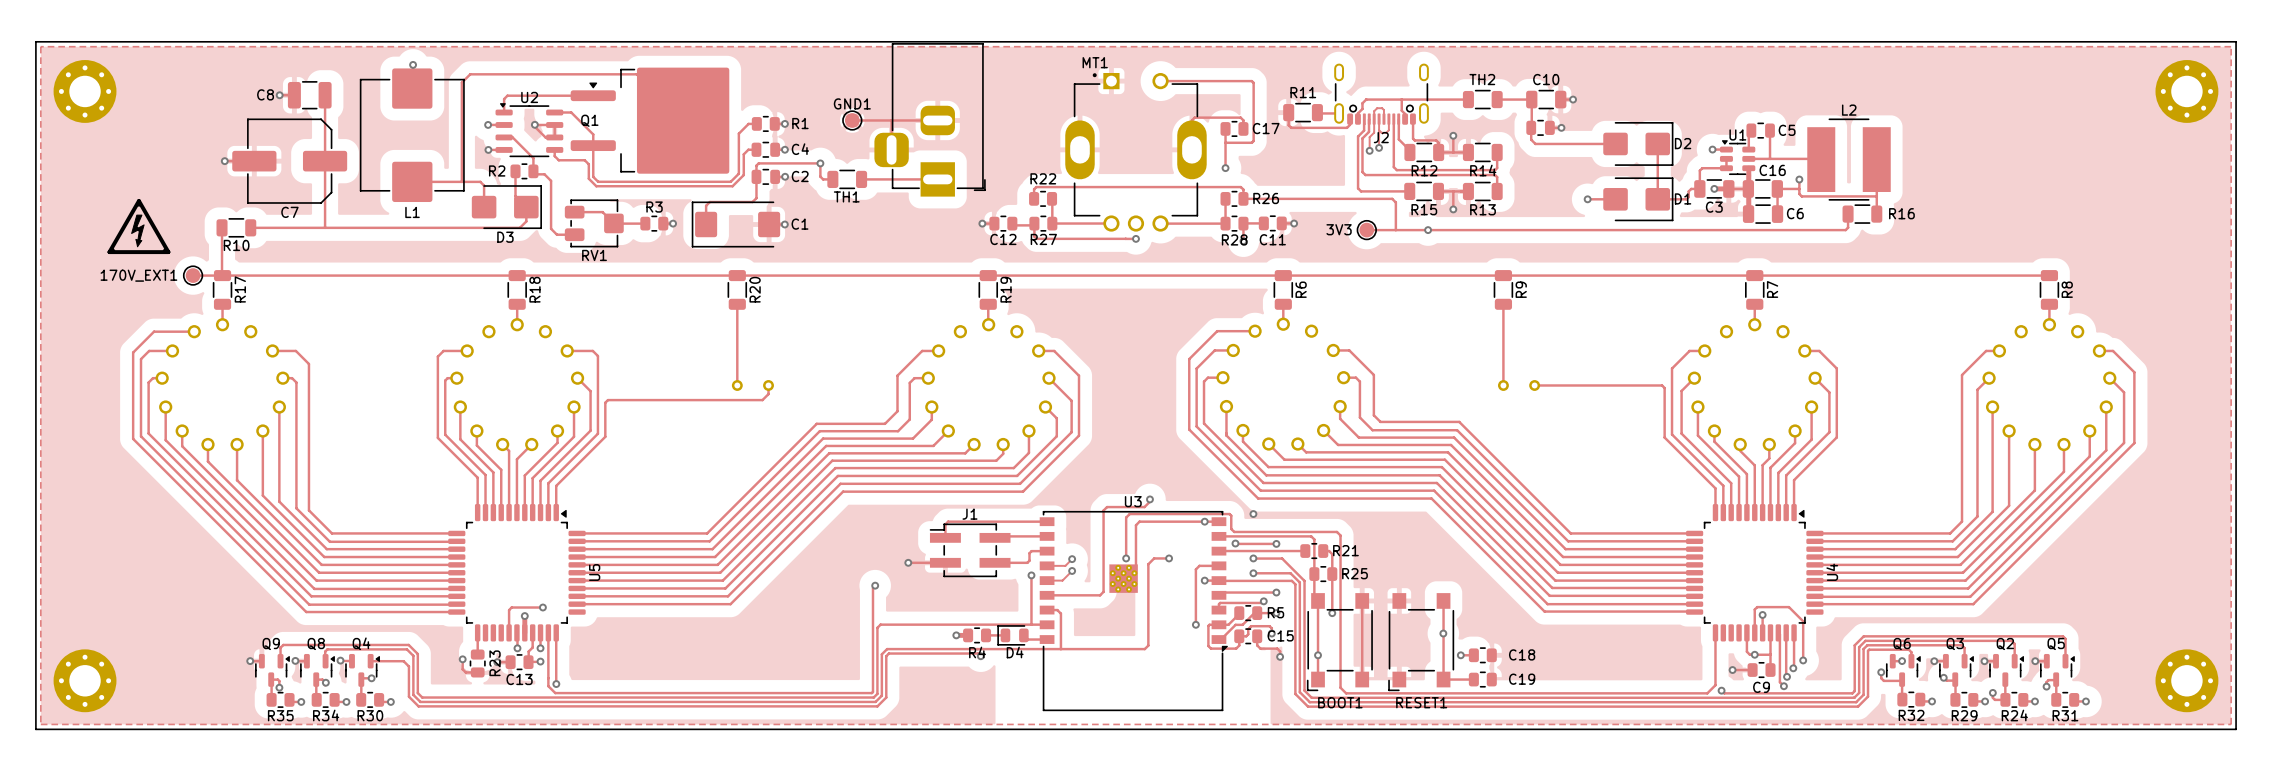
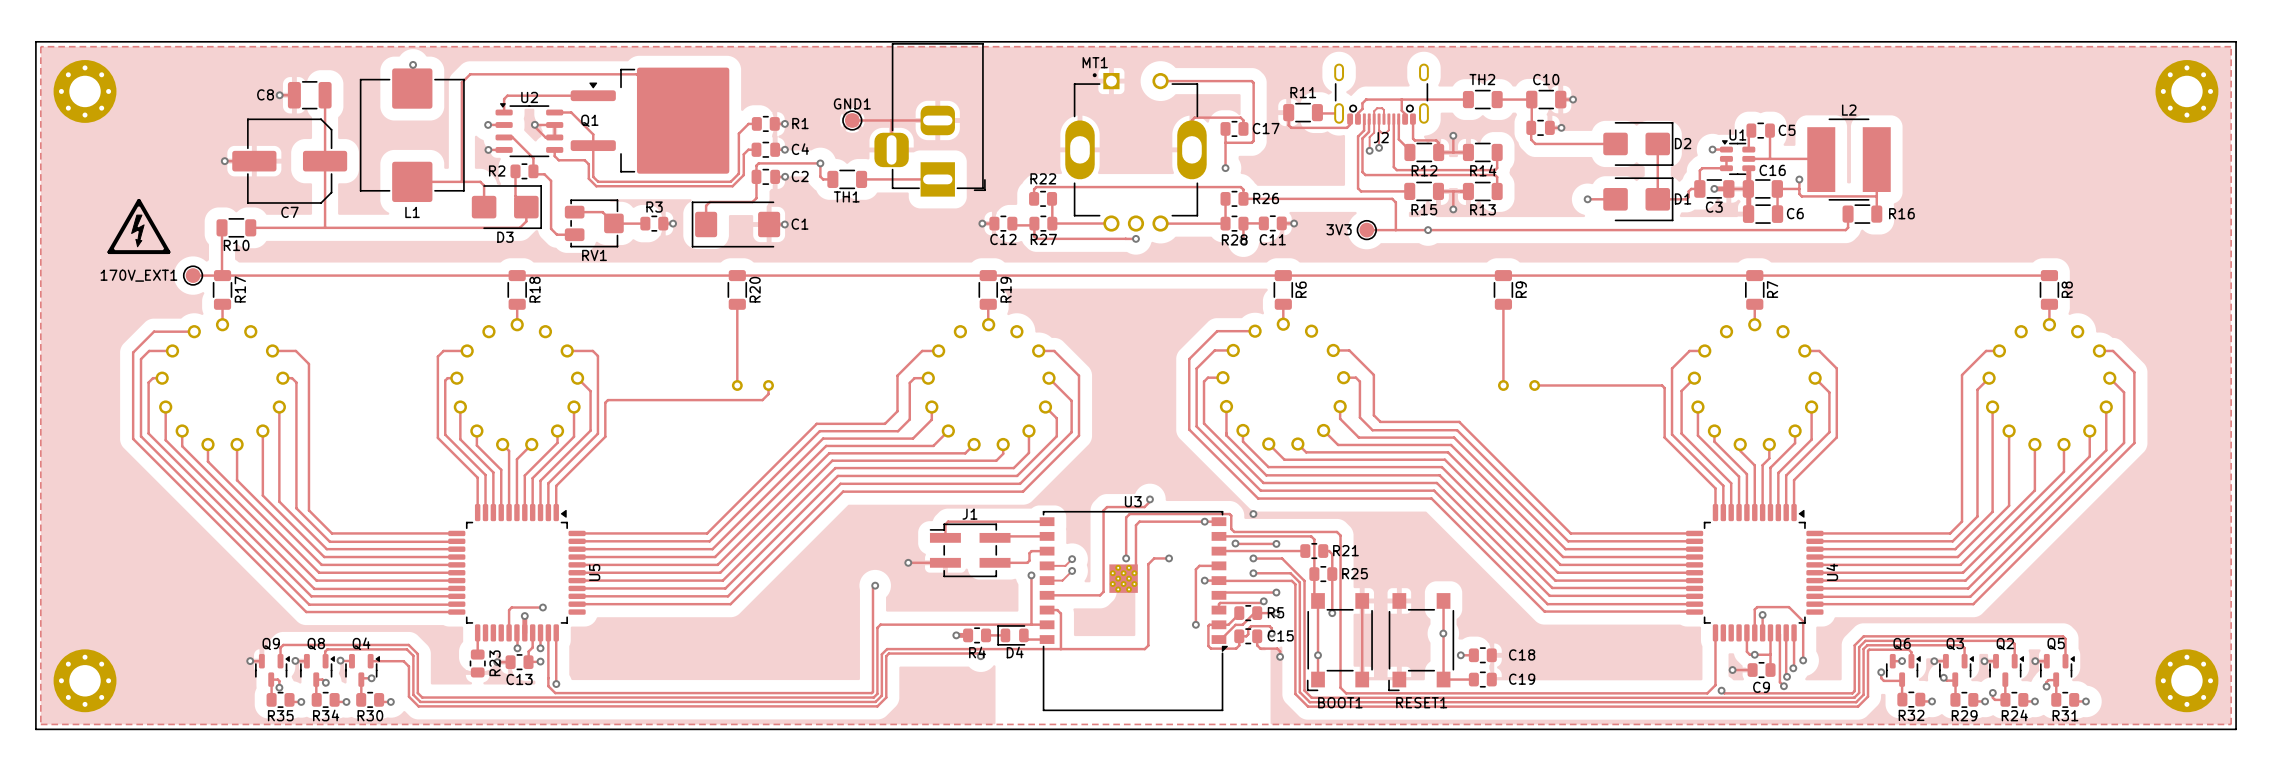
track: (462, 659) (462, 669) (465, 672) (477, 672) -> none
via: (462, 659) -> none

